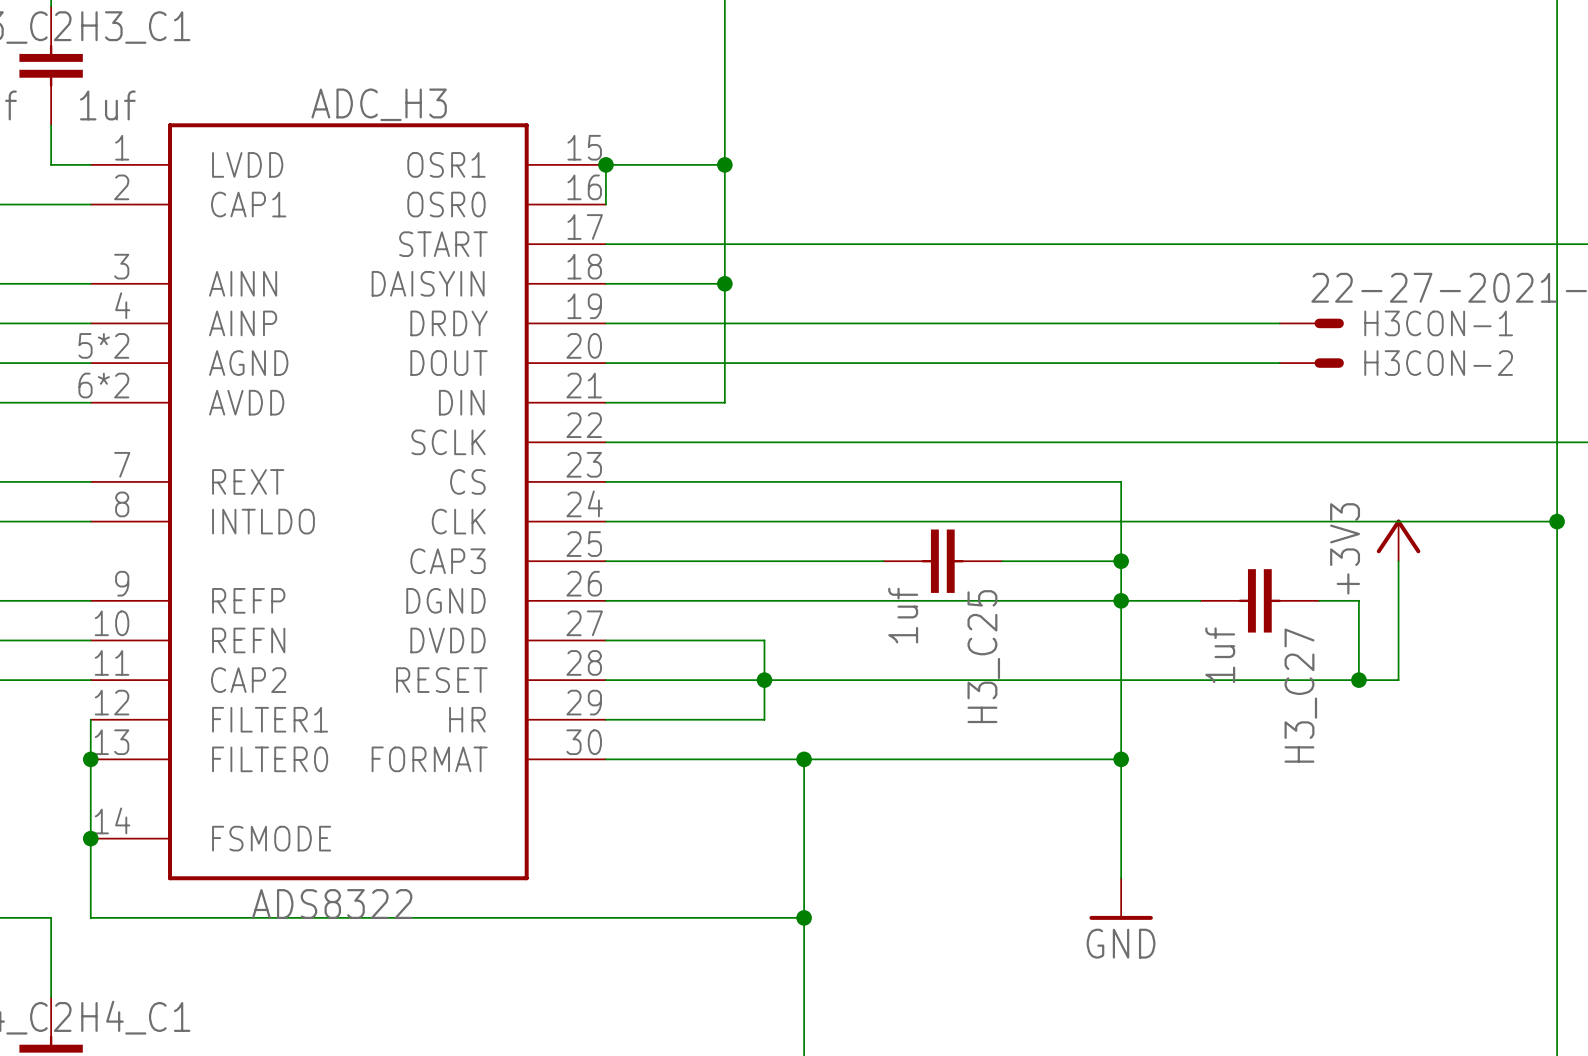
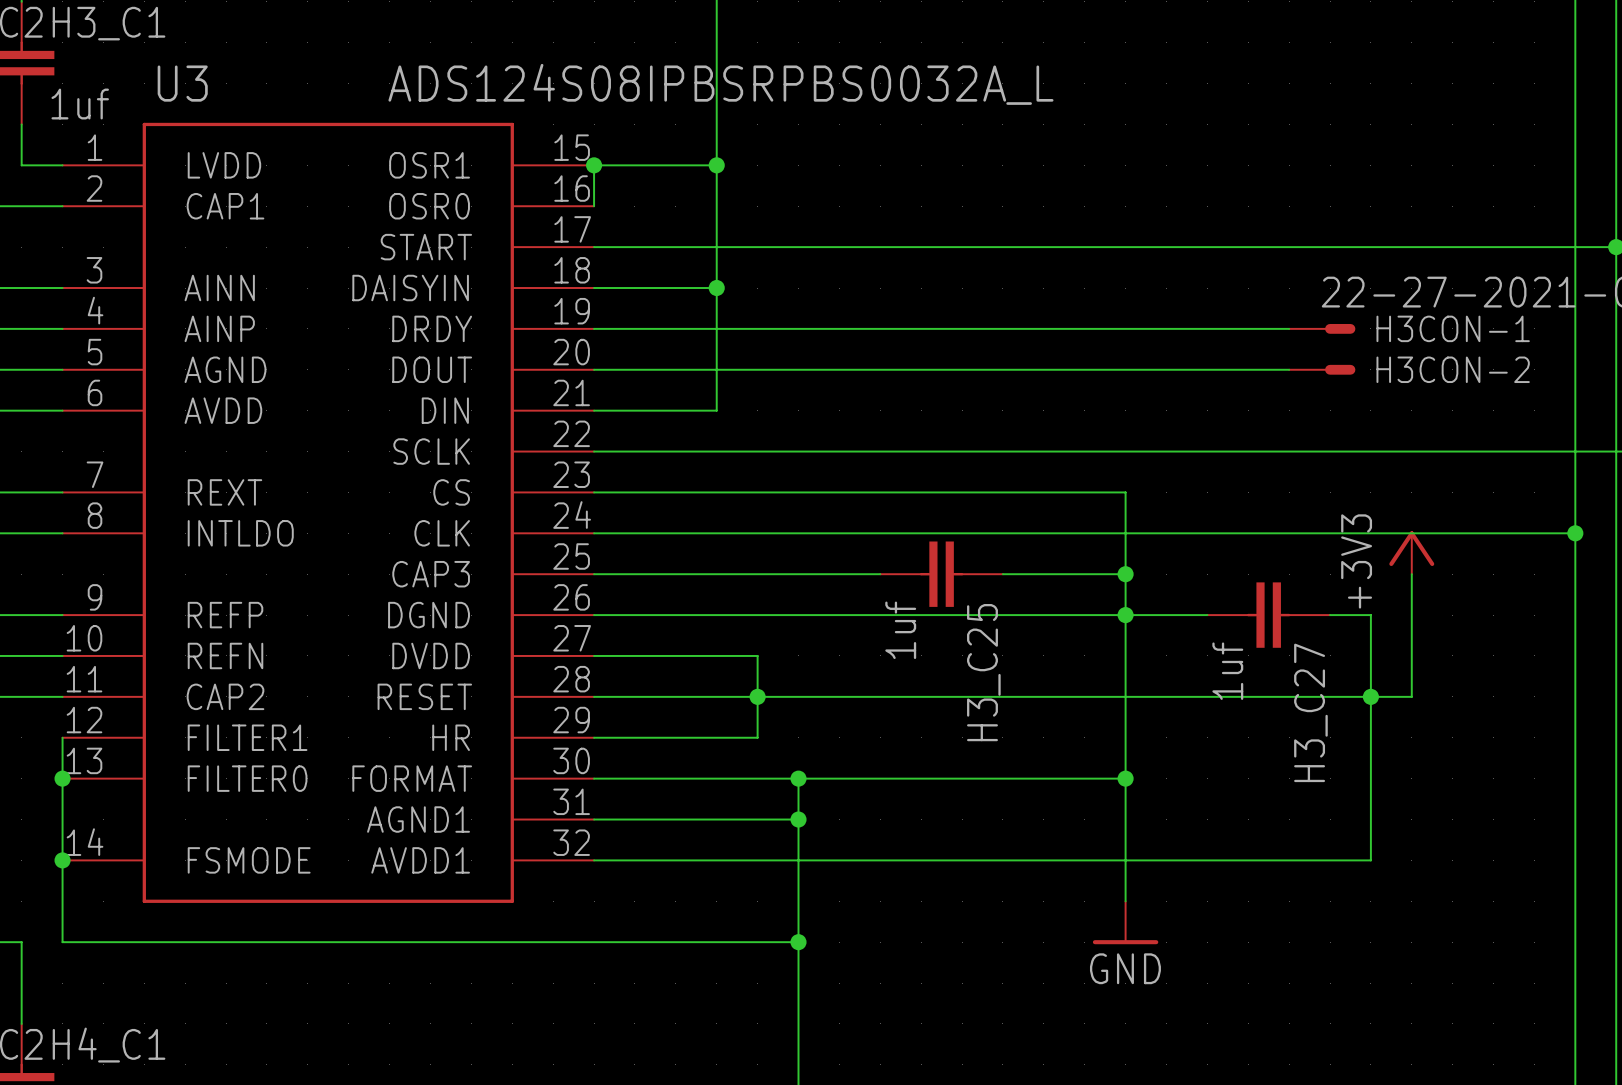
ADC_H3: ADS8322 (348, 501) -> none
U3: none -> ADS124S08IPBSRPBS0032A_L (328, 512)
wire: none -> (1370, 696) (1370, 860) (594, 860)
wire: none -> (594, 819) (798, 819)
junction: none -> (798, 819)

